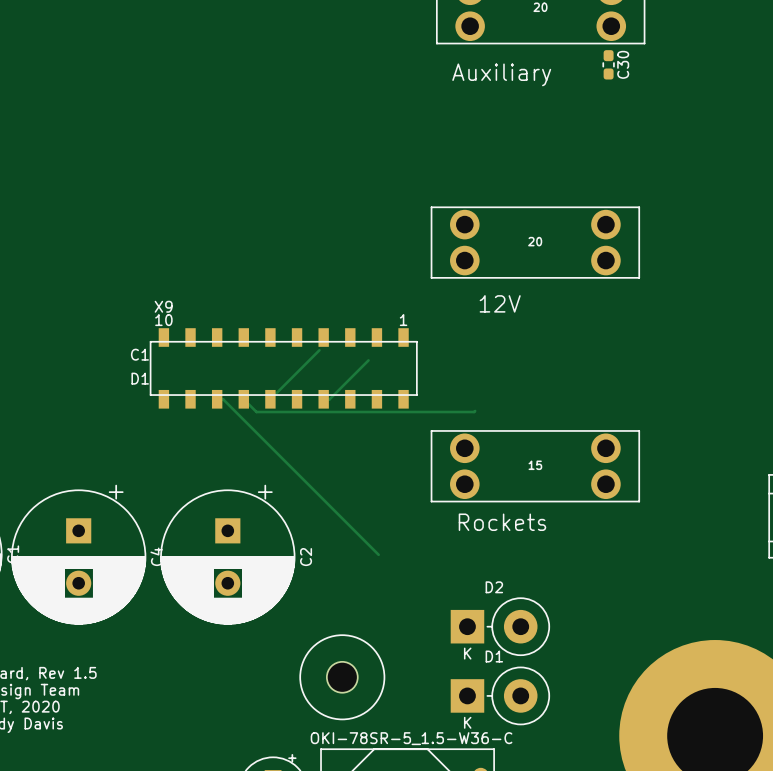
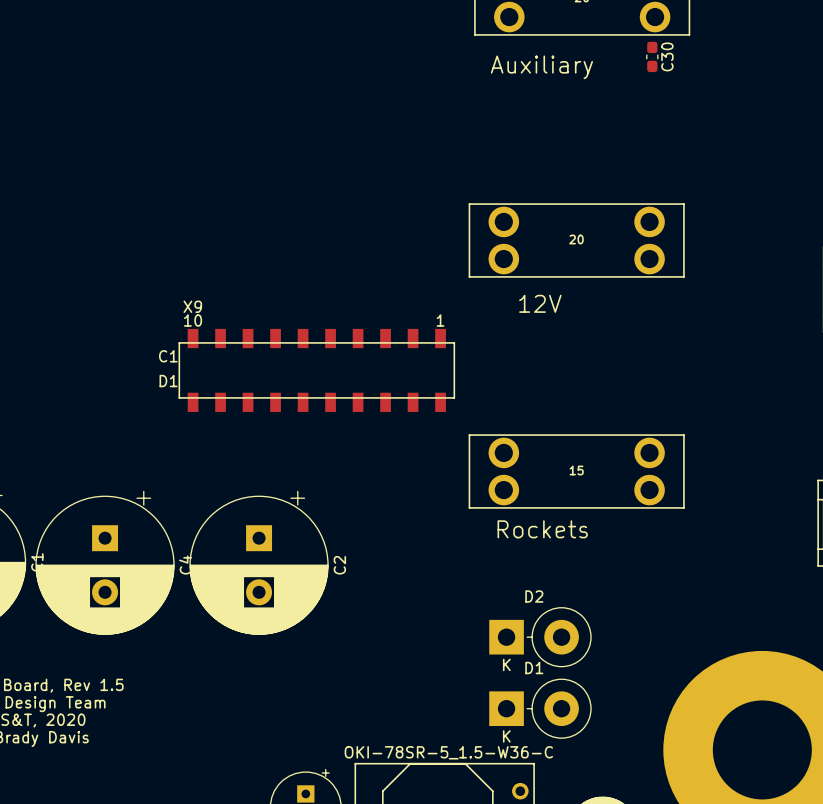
track: (319, 350) (270, 399) -> none
track: (368, 360) (329, 399) (323, 399) -> none
track: (217, 399) (223, 399) (378, 554) -> none
track: (243, 399) (256, 412) (475, 411) -> none
part: (342, 677) -> none

